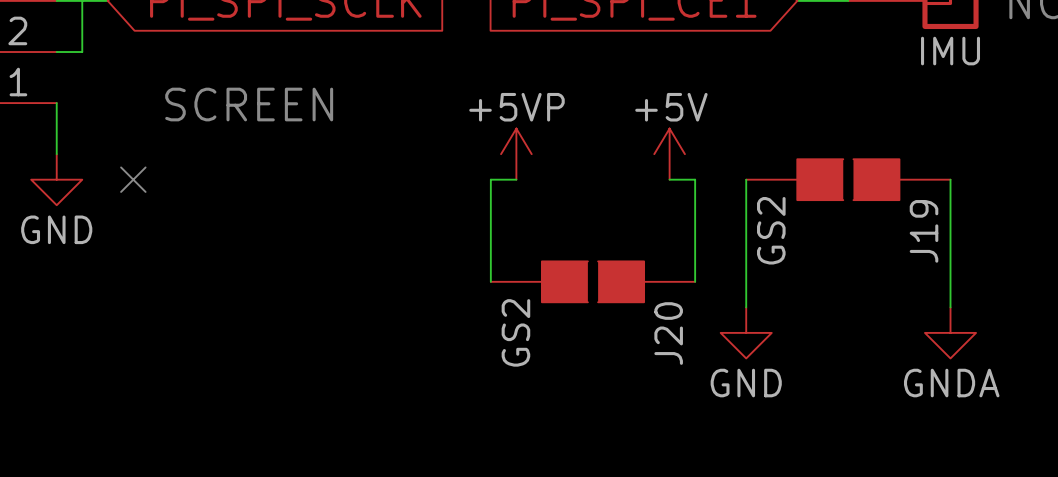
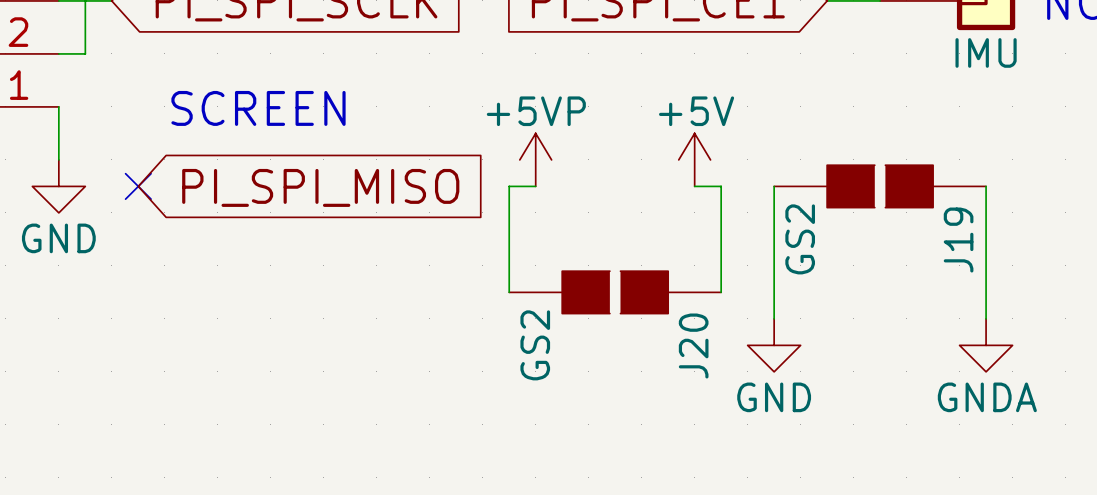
global label: none -> PI_SPI_MISO (320, 187)

